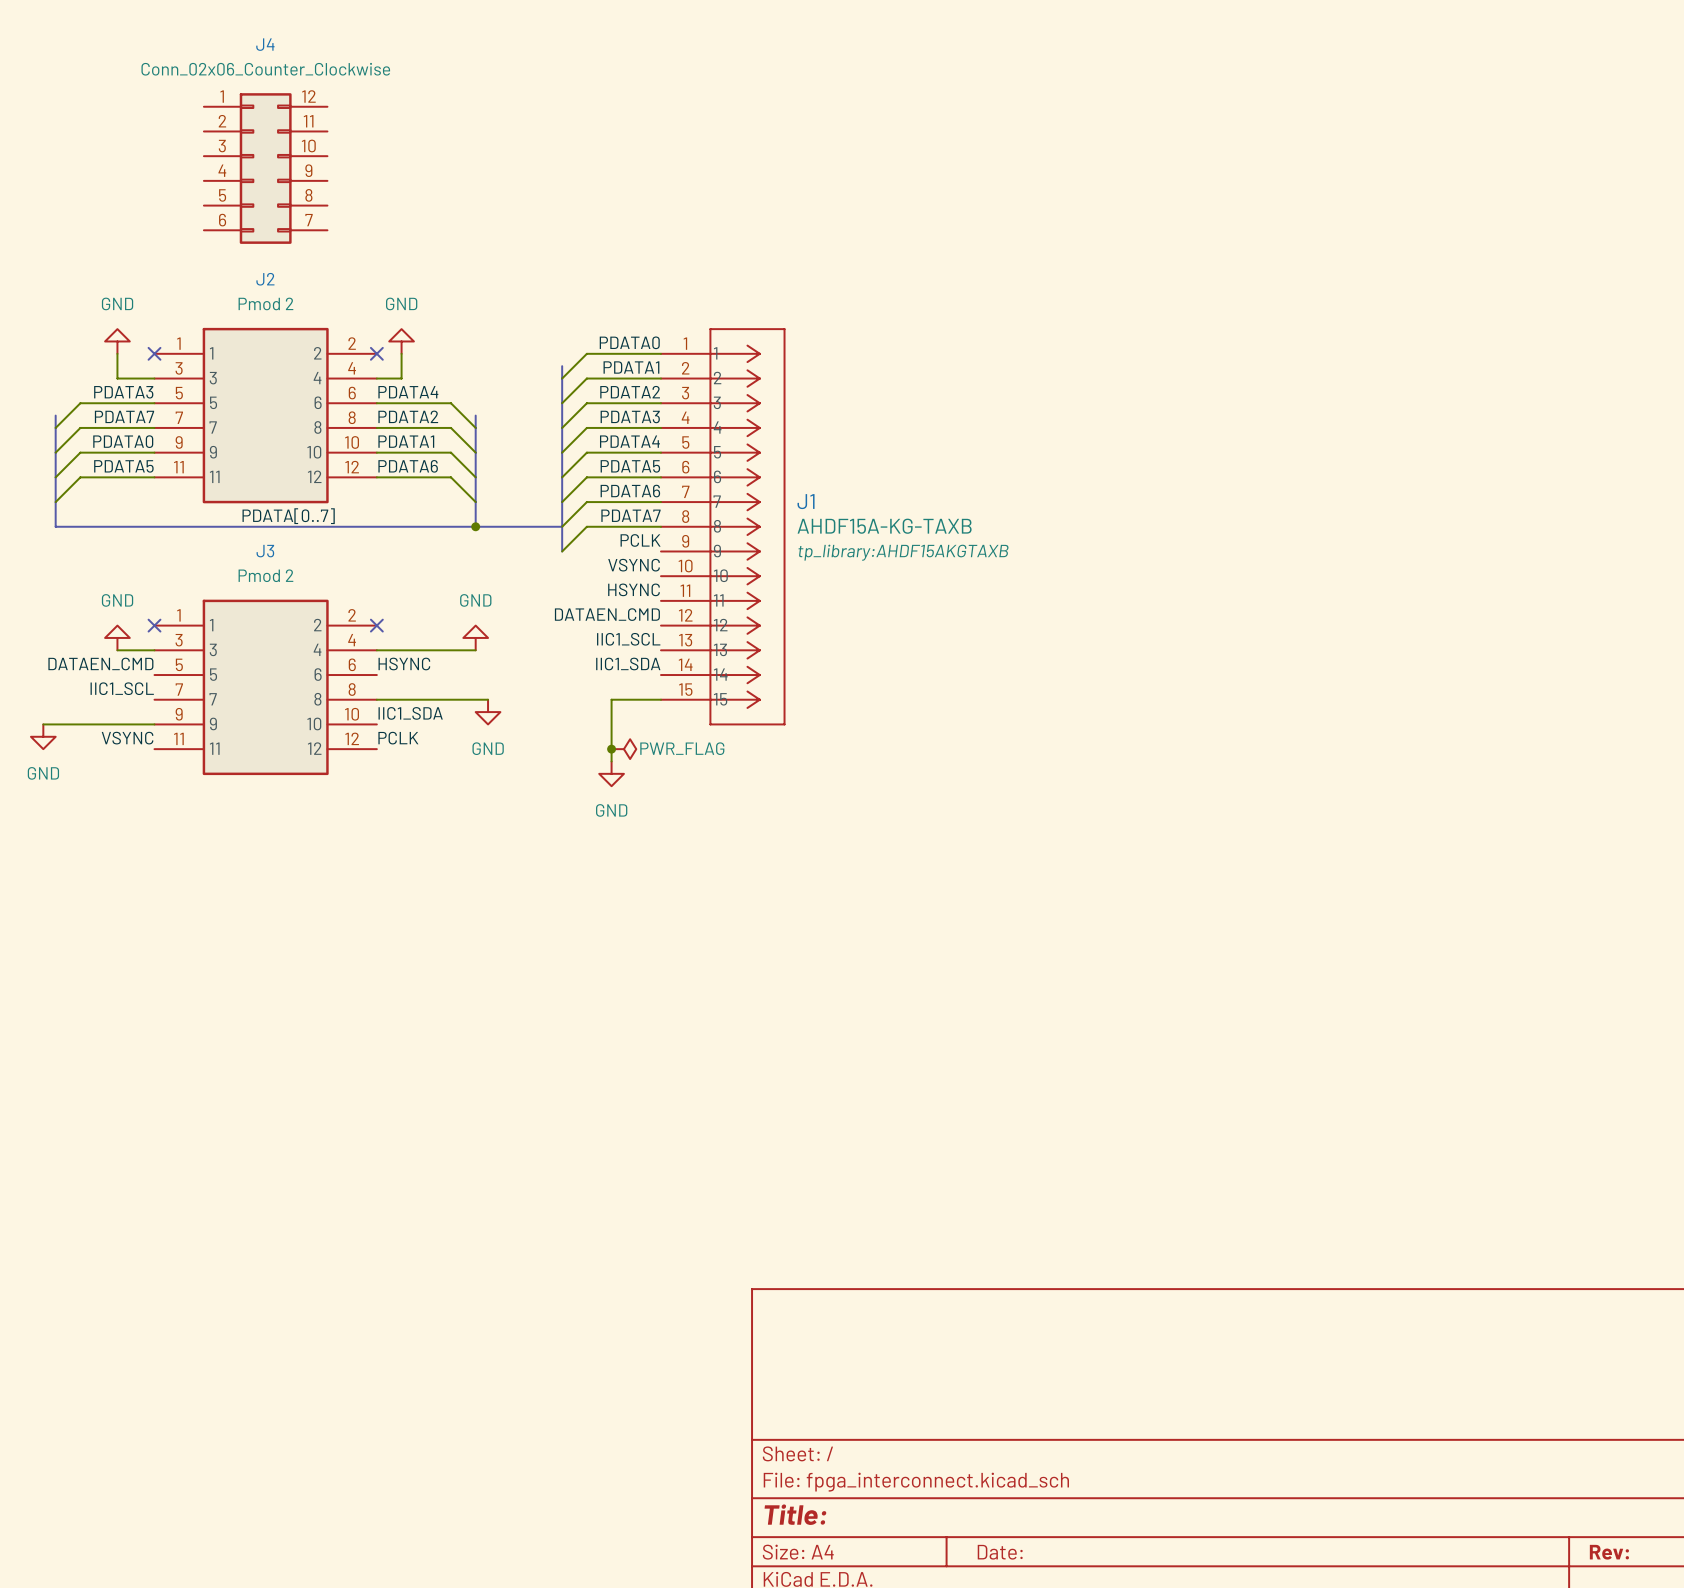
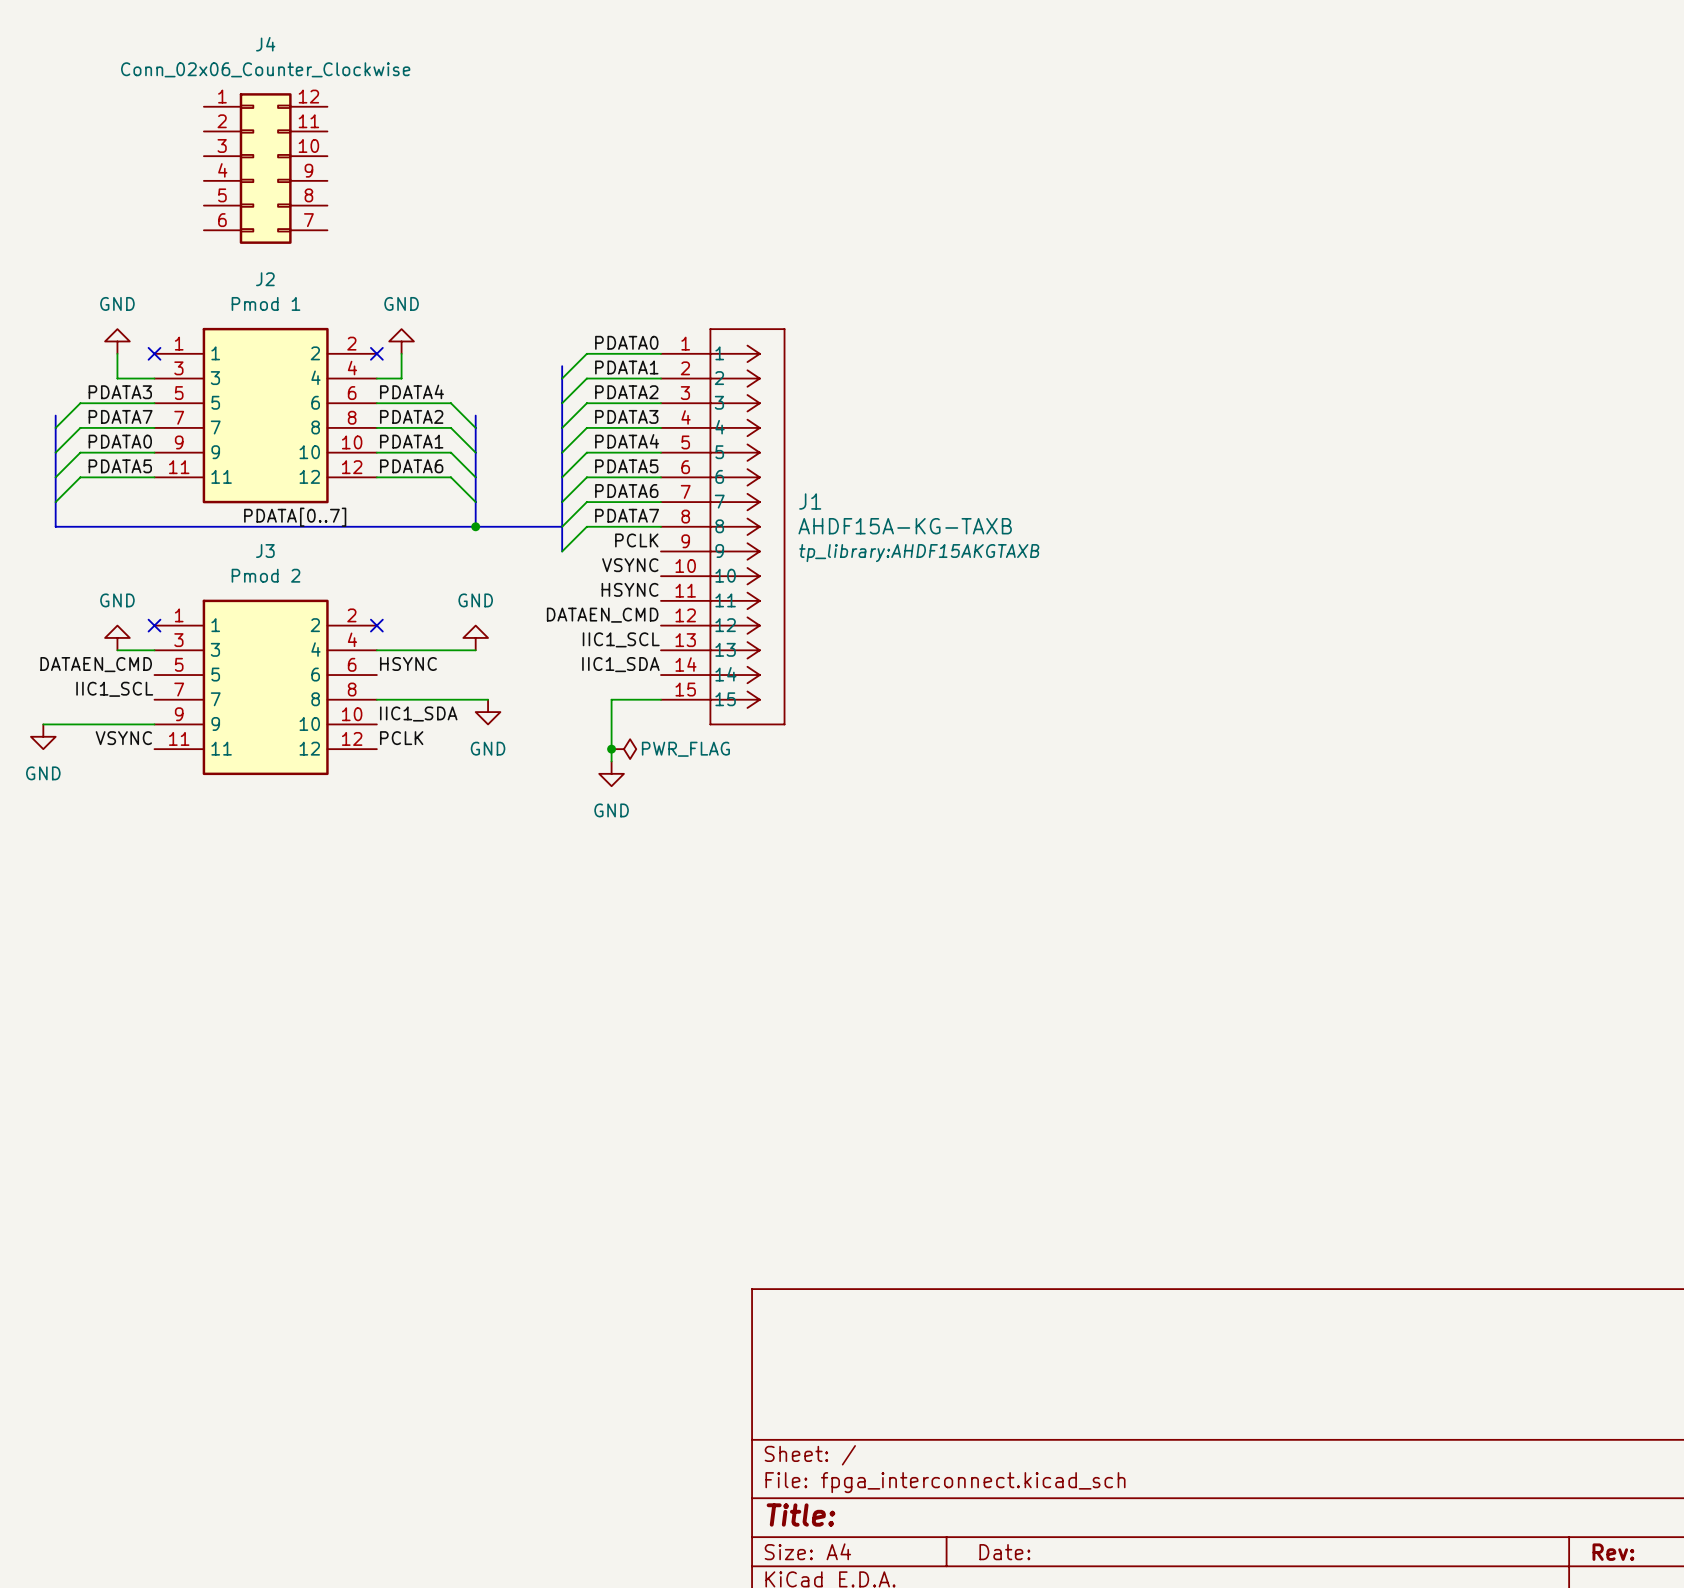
J2 value: Pmod 2 (265, 303) -> Pmod 1 (265, 303)

